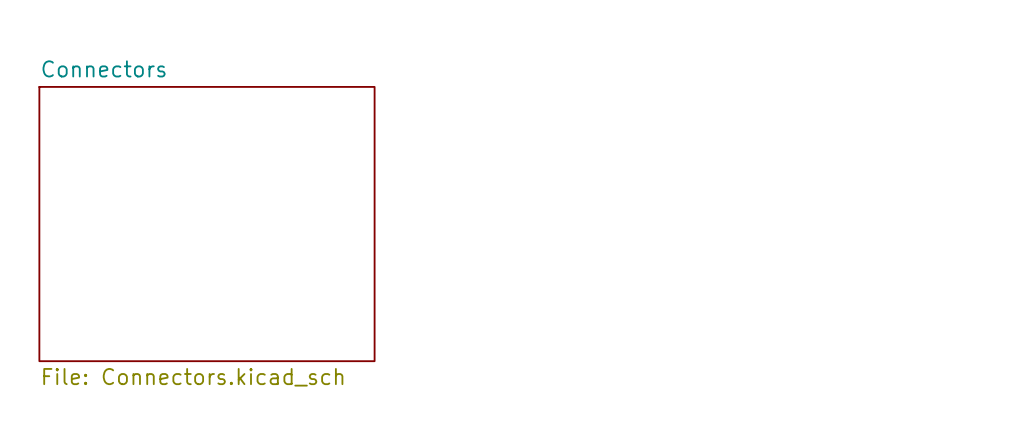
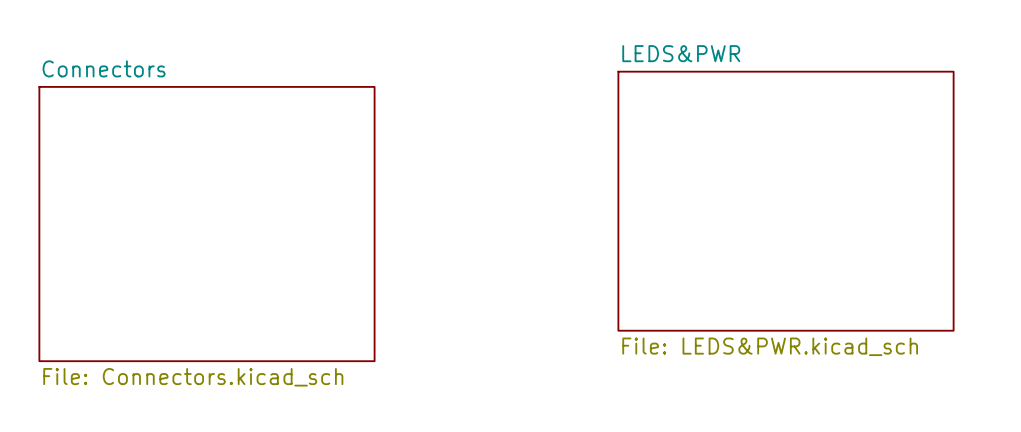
sheet LEDS&PWR: none -> File: LEDS&PWR.kicad_sch (786, 201)

